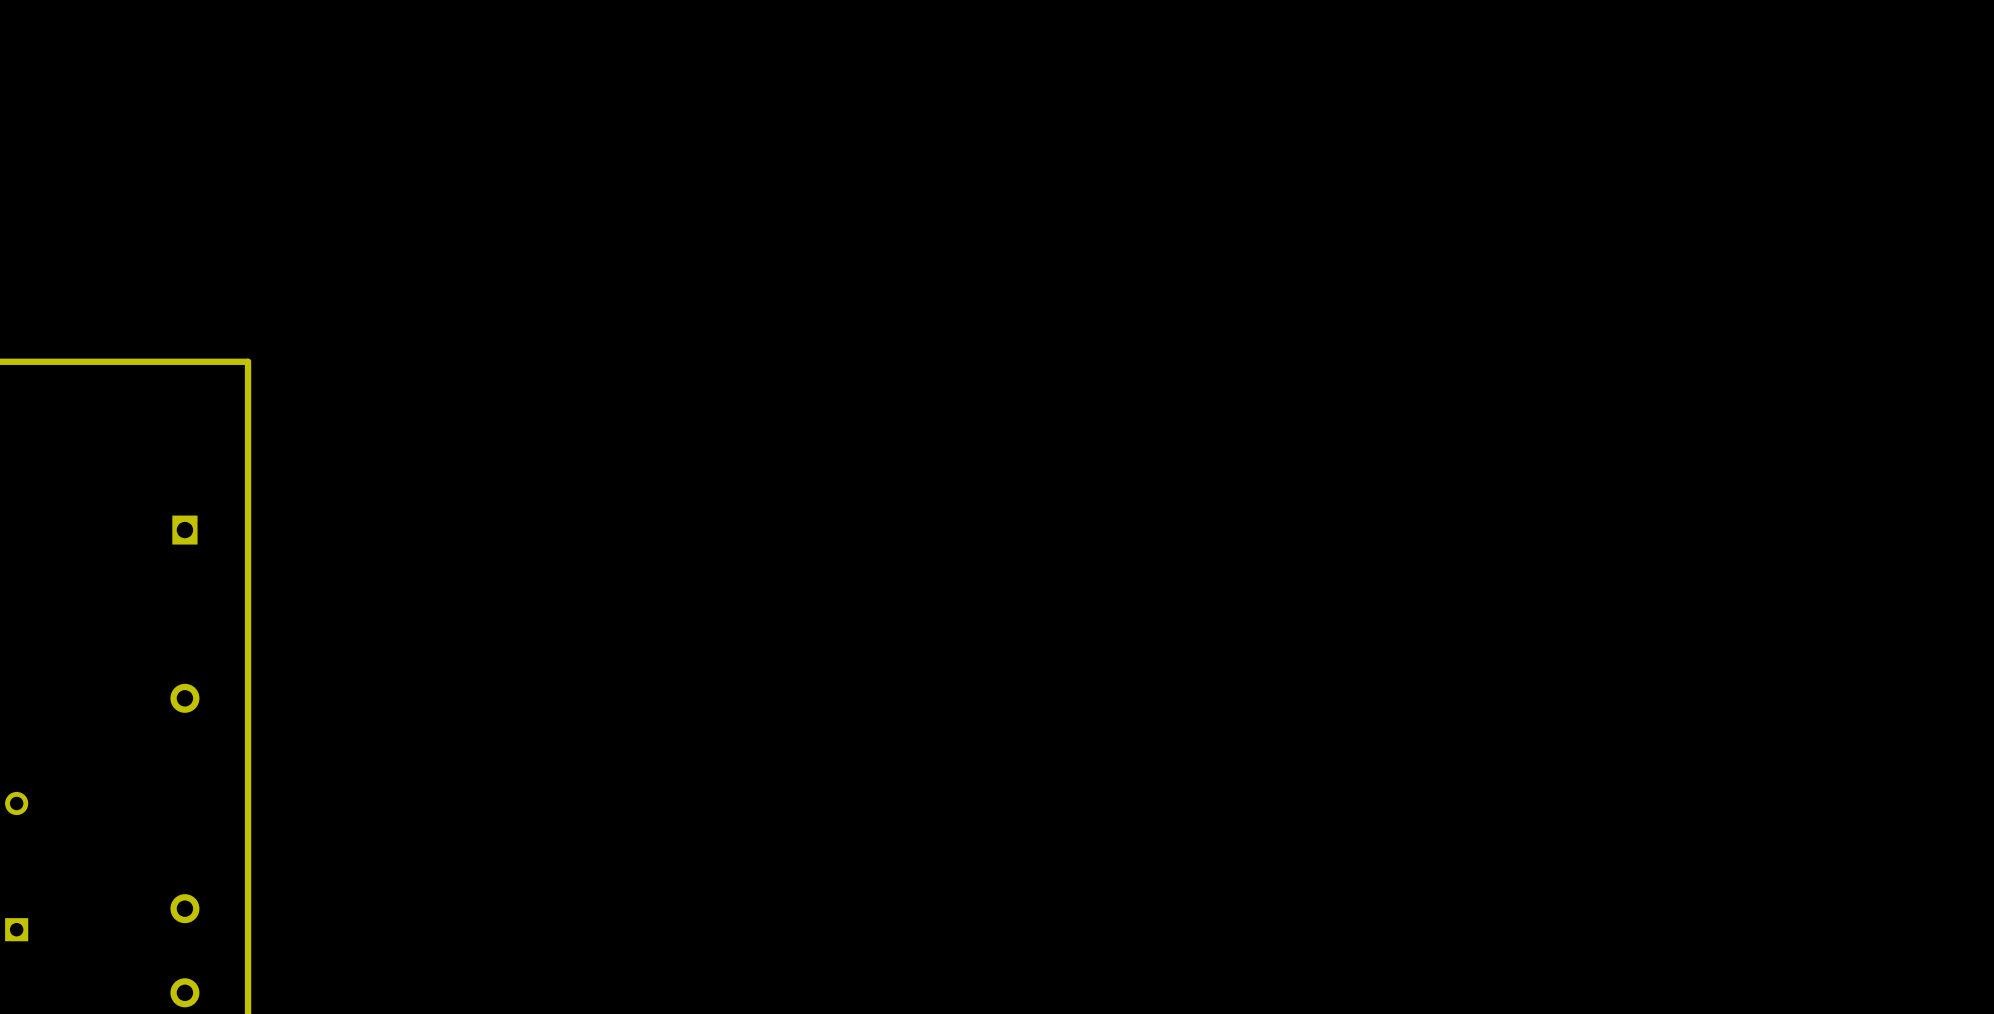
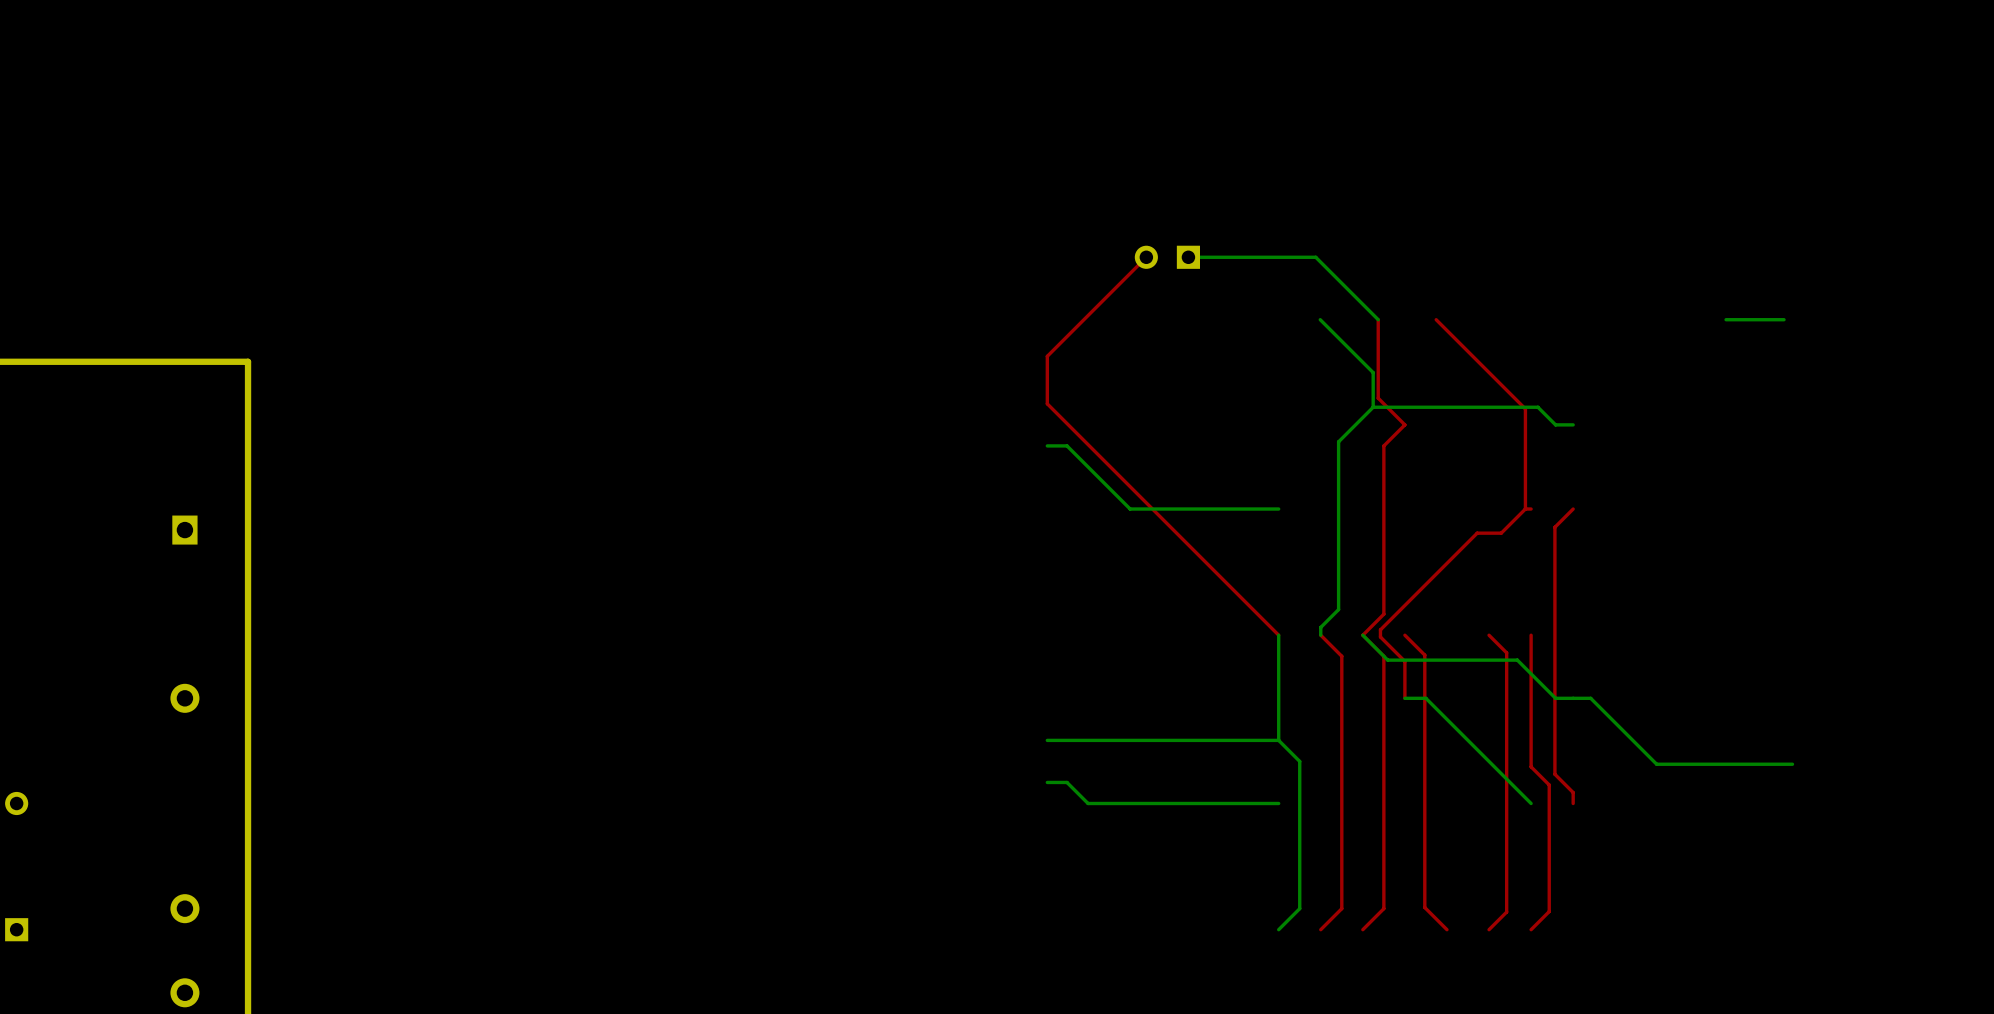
top track: none -> (1146, 257) (1047, 356) (1047, 403) (1278, 635)
part: none -> (1167, 257)
bottom track: none -> (1188, 257) (1315, 257) (1378, 319)
bottom track: none -> (1320, 319) (1373, 372) (1373, 407)
top track: none -> (1378, 319) (1378, 398) (1404, 424) (1383, 445) (1383, 614) (1362, 635) (1383, 656) (1383, 908) (1362, 929)
top track: none -> (1436, 319) (1525, 408) (1525, 509)
bottom track: none -> (1784, 319) (1726, 319)
bottom track: none -> (1373, 407) (1338, 441) (1338, 609) (1320, 627) (1320, 635)
bottom track: none -> (1373, 407) (1537, 407) (1555, 424) (1573, 424)
bottom track: none -> (1047, 445) (1067, 445) (1130, 509) (1278, 509)
top track: none -> (1525, 509) (1501, 533) (1477, 533) (1380, 629) (1380, 636) (1404, 661) (1404, 698)
top track: none -> (1531, 509) (1525, 509)
top track: none -> (1573, 509) (1554, 527) (1554, 774) (1573, 792) (1573, 803)
bottom track: none -> (1278, 635) (1278, 740)
top track: none -> (1320, 635) (1341, 656) (1341, 908) (1320, 929)
bottom track: none -> (1362, 635) (1387, 660) (1517, 660) (1555, 698) (1590, 698) (1656, 764) (1792, 764)
top track: none -> (1404, 635) (1424, 655) (1424, 907) (1446, 929)
top track: none -> (1489, 635) (1506, 652) (1506, 912) (1489, 929)
top track: none -> (1531, 635) (1531, 766) (1549, 784) (1549, 911) (1531, 929)
bottom track: none -> (1404, 698) (1425, 698) (1531, 803)
bottom track: none -> (1278, 740) (1047, 740)
bottom track: none -> (1278, 740) (1299, 761) (1299, 908) (1278, 929)
bottom track: none -> (1047, 782) (1067, 782) (1088, 803) (1278, 803)

